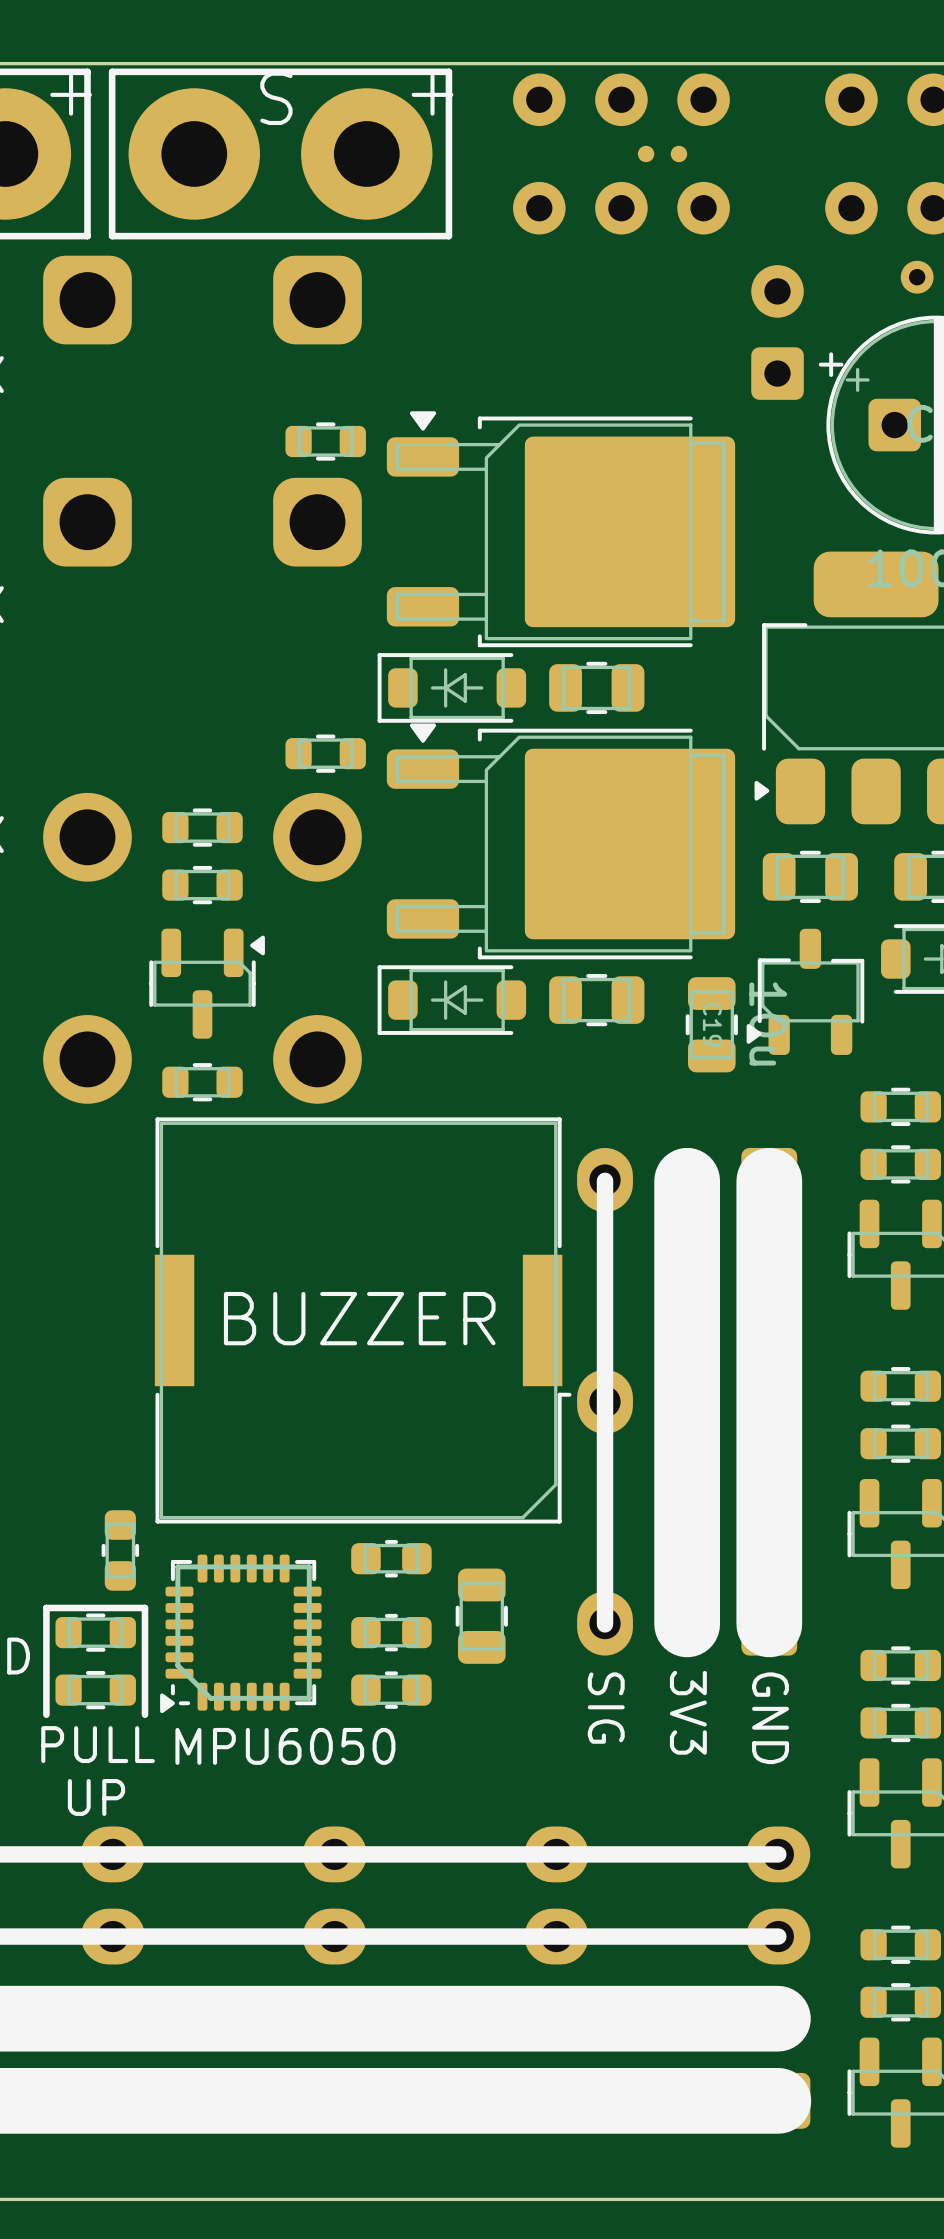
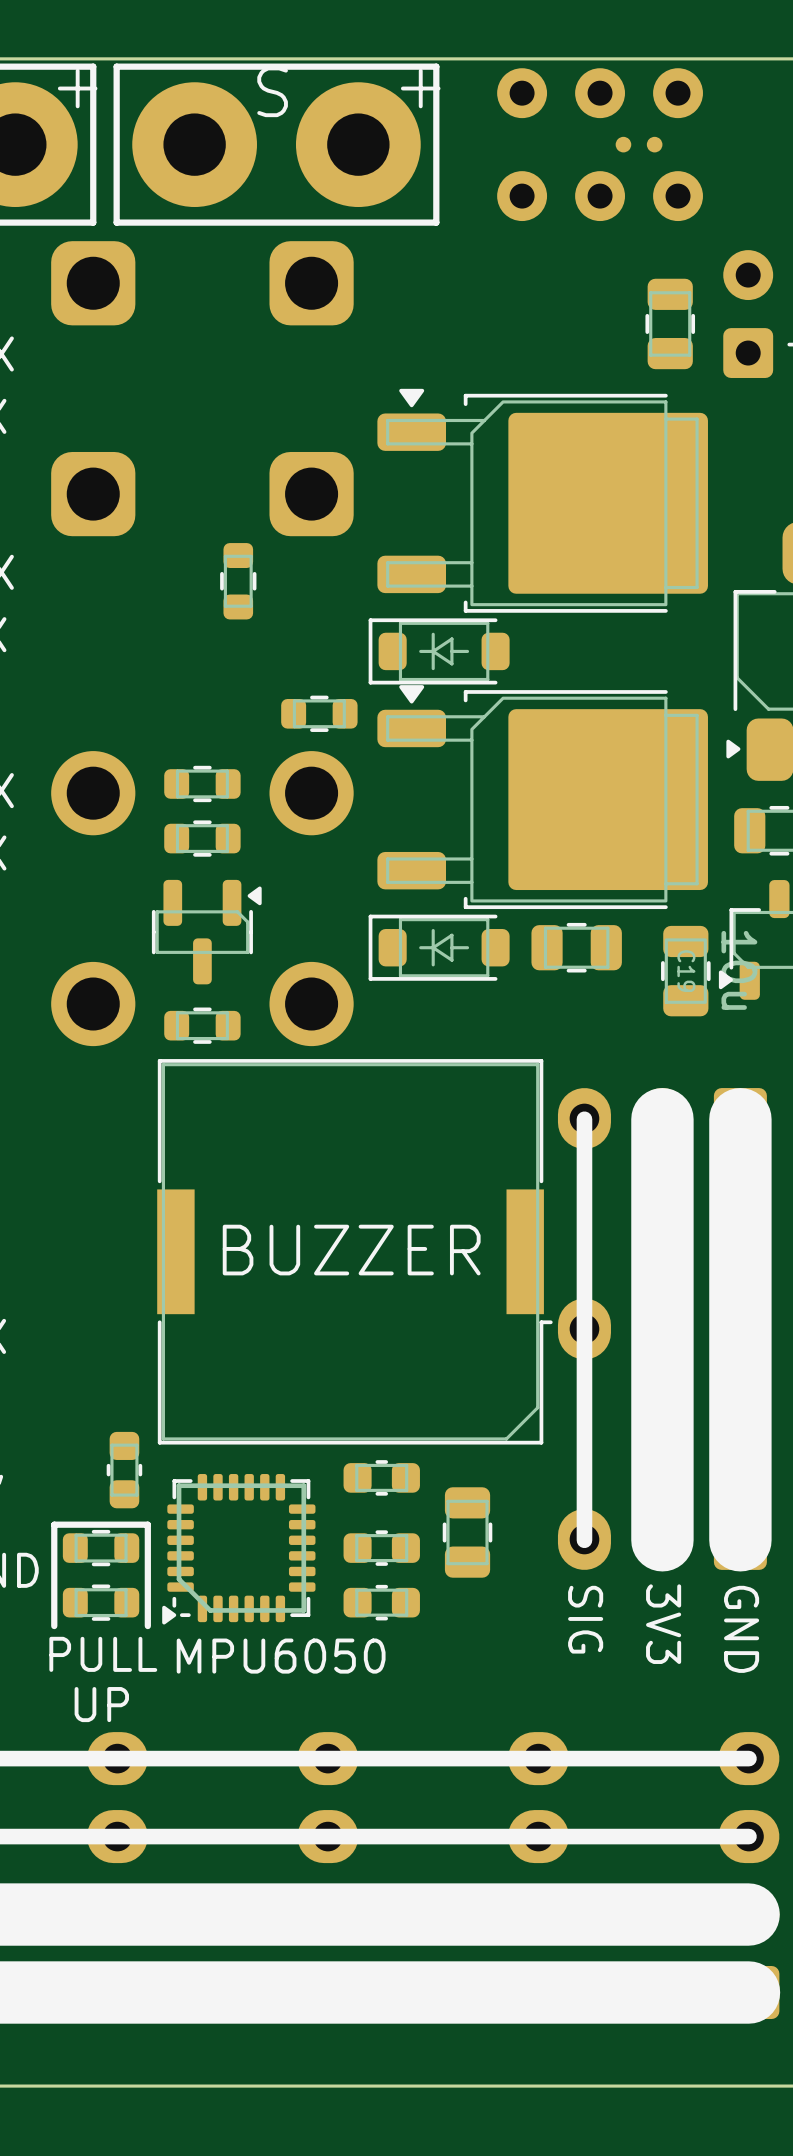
part rotation: 0° (325, 441) -> 90° clockwise (238, 581)
part position: (325, 441) -> (238, 581)
part rotation: 0° (596, 687) -> 90° clockwise (670, 323)
part position: (596, 687) -> (670, 323)

